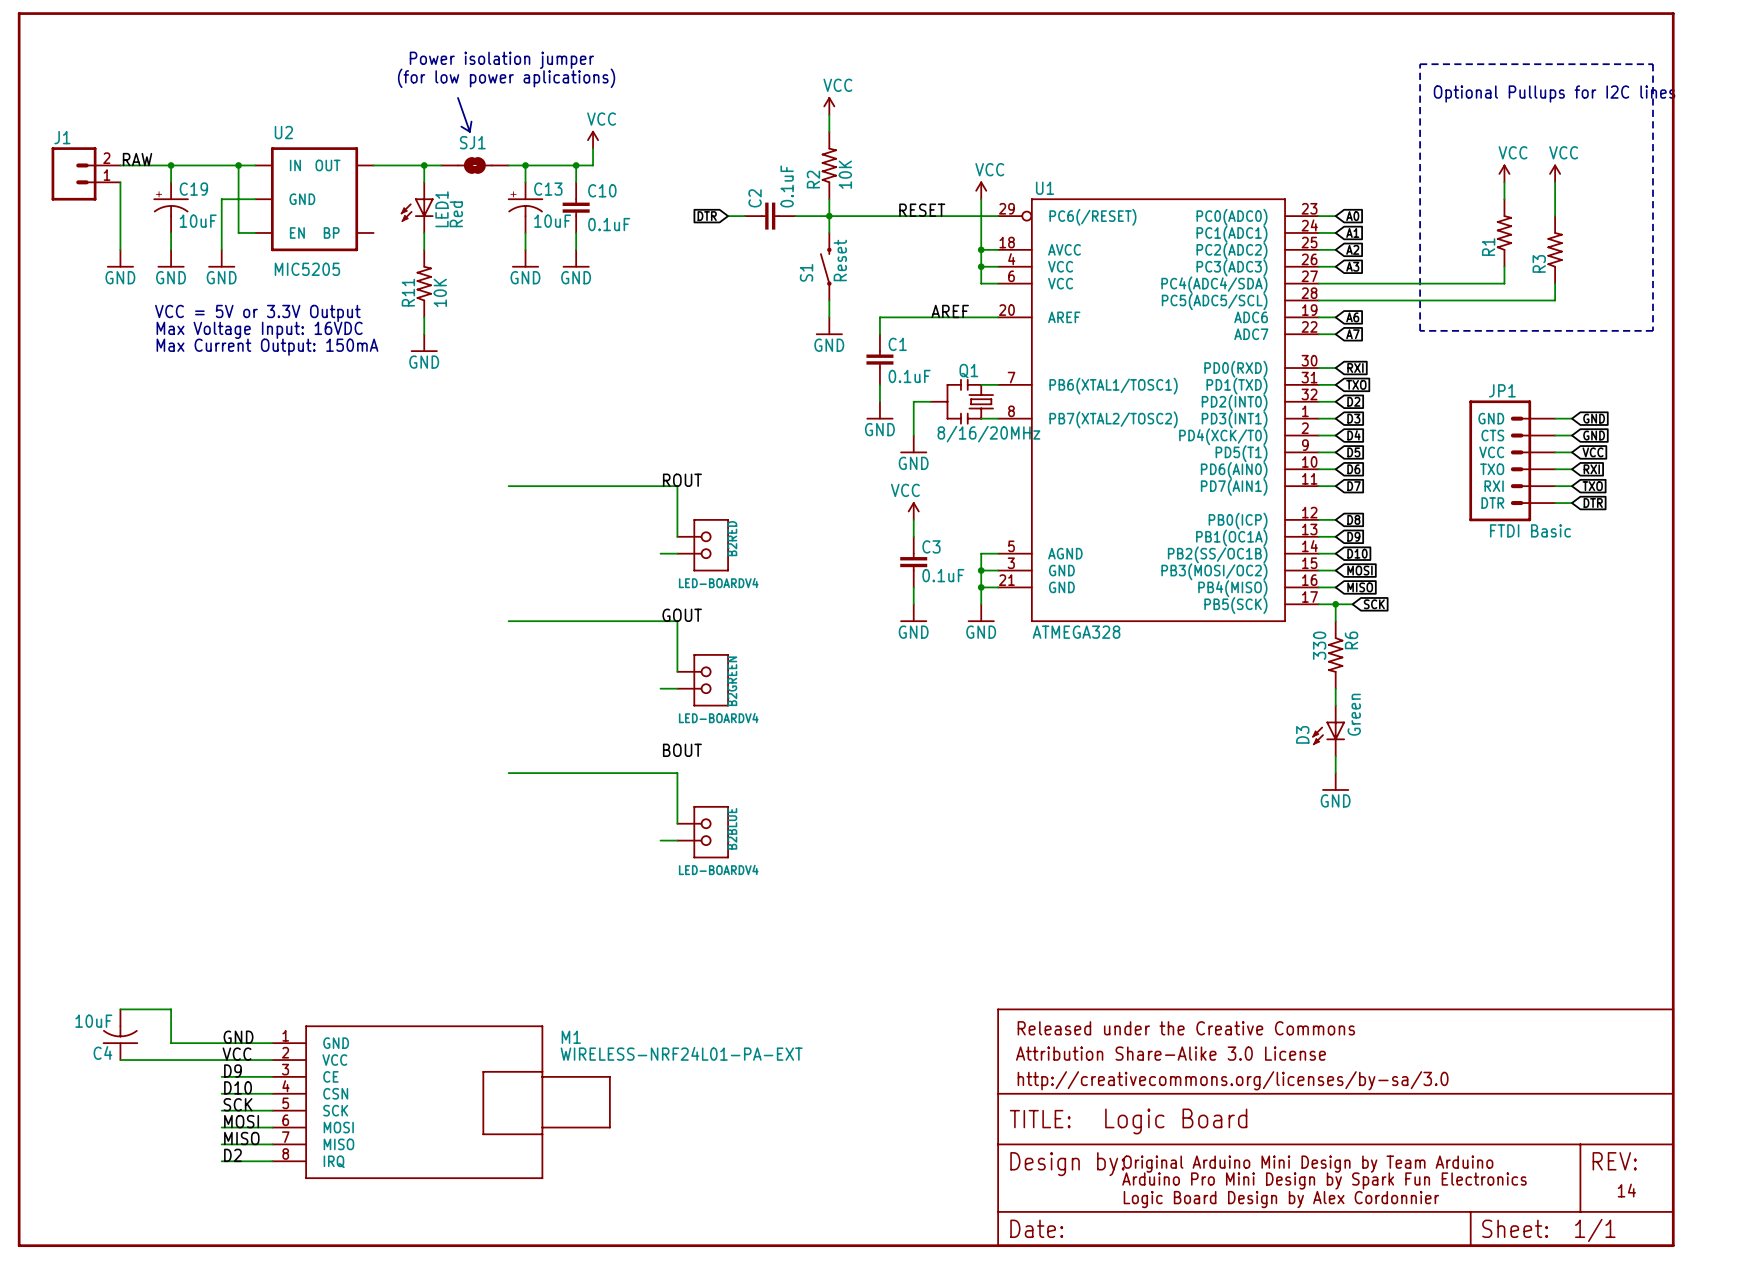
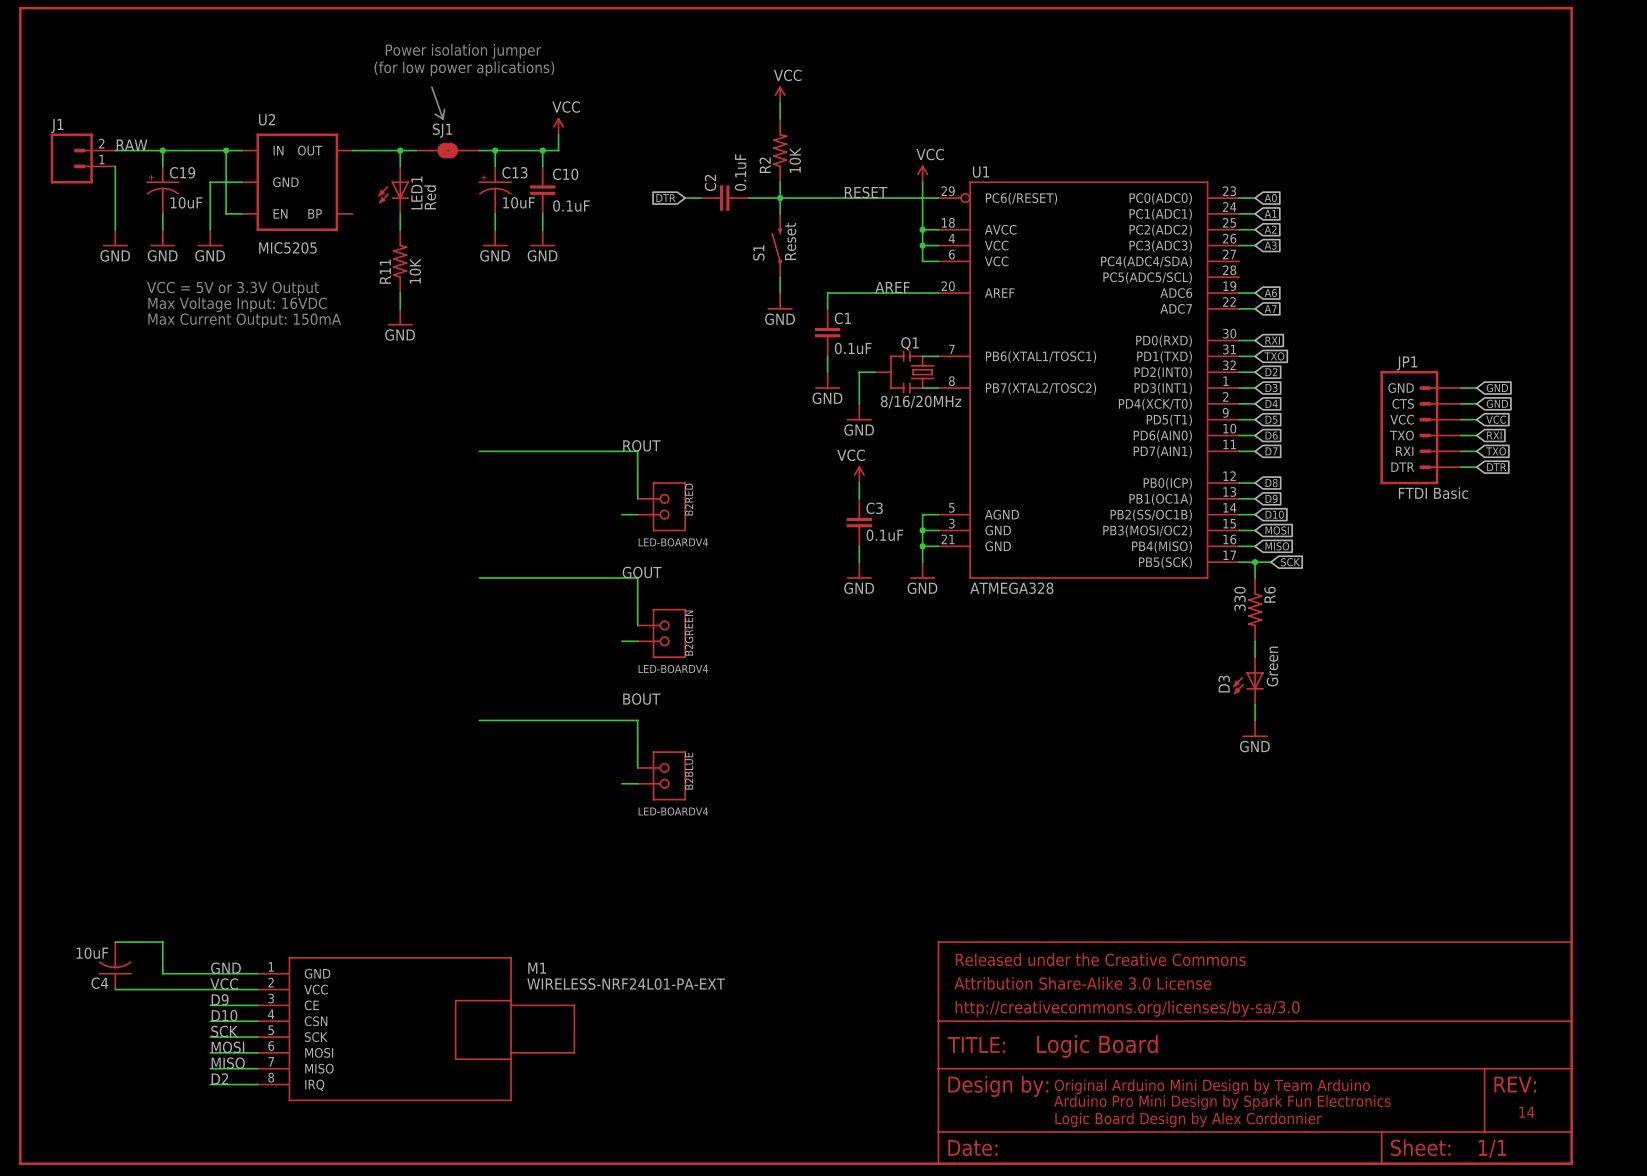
line: (1420, 64) (1652, 64) (1652, 330) (1420, 330) (1420, 64) -> none
text: Optional Pullups for I2C lines (1554, 94) -> none
power symbol: VCC (1504, 173) -> none
power symbol: VCC (1555, 173) -> none
wire: (1504, 182) (1504, 199) -> none
wire: (1555, 182) (1555, 216) -> none
R1: (1504, 232) -> none
R3: (1555, 249) -> none
wire: (1504, 266) (1504, 283) (1318, 283) -> none
wire: (1555, 283) (1555, 300) (1318, 300) -> none

